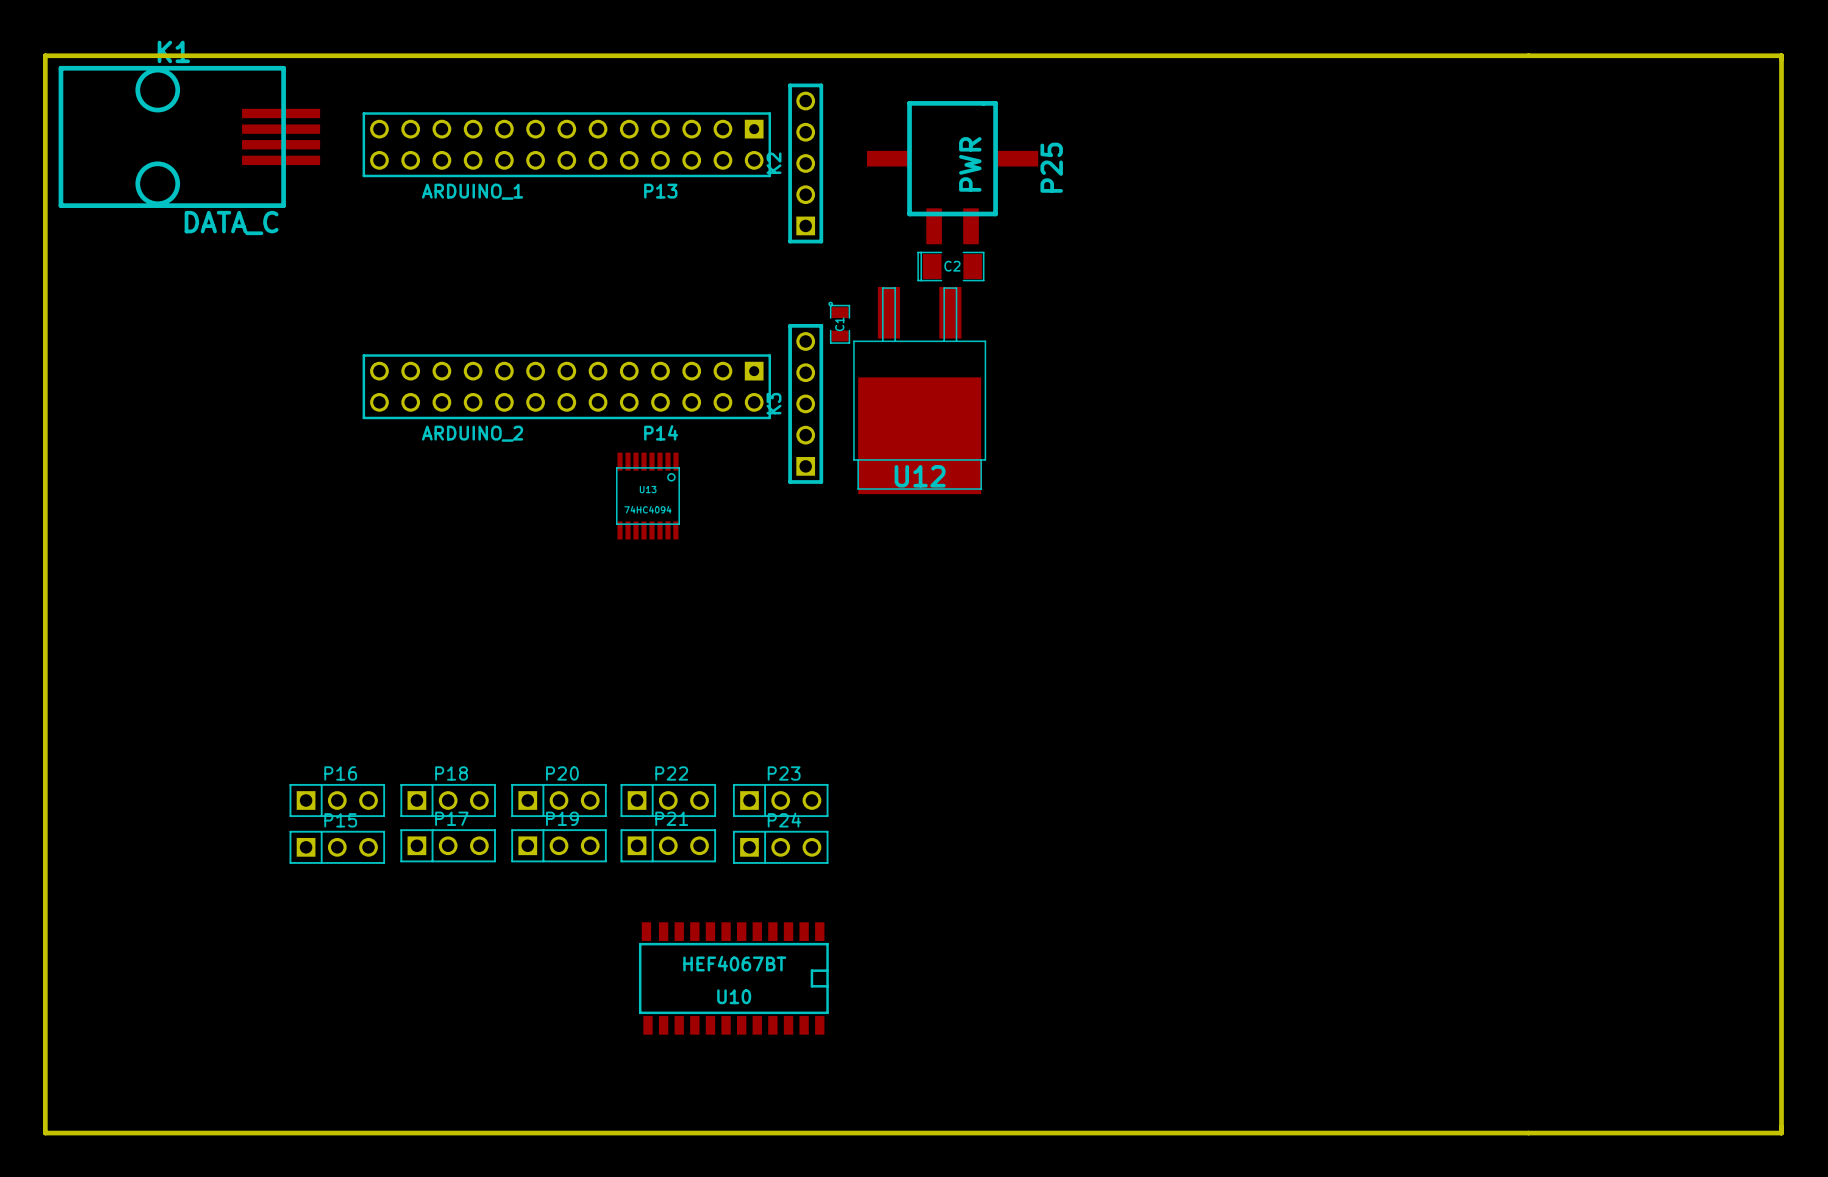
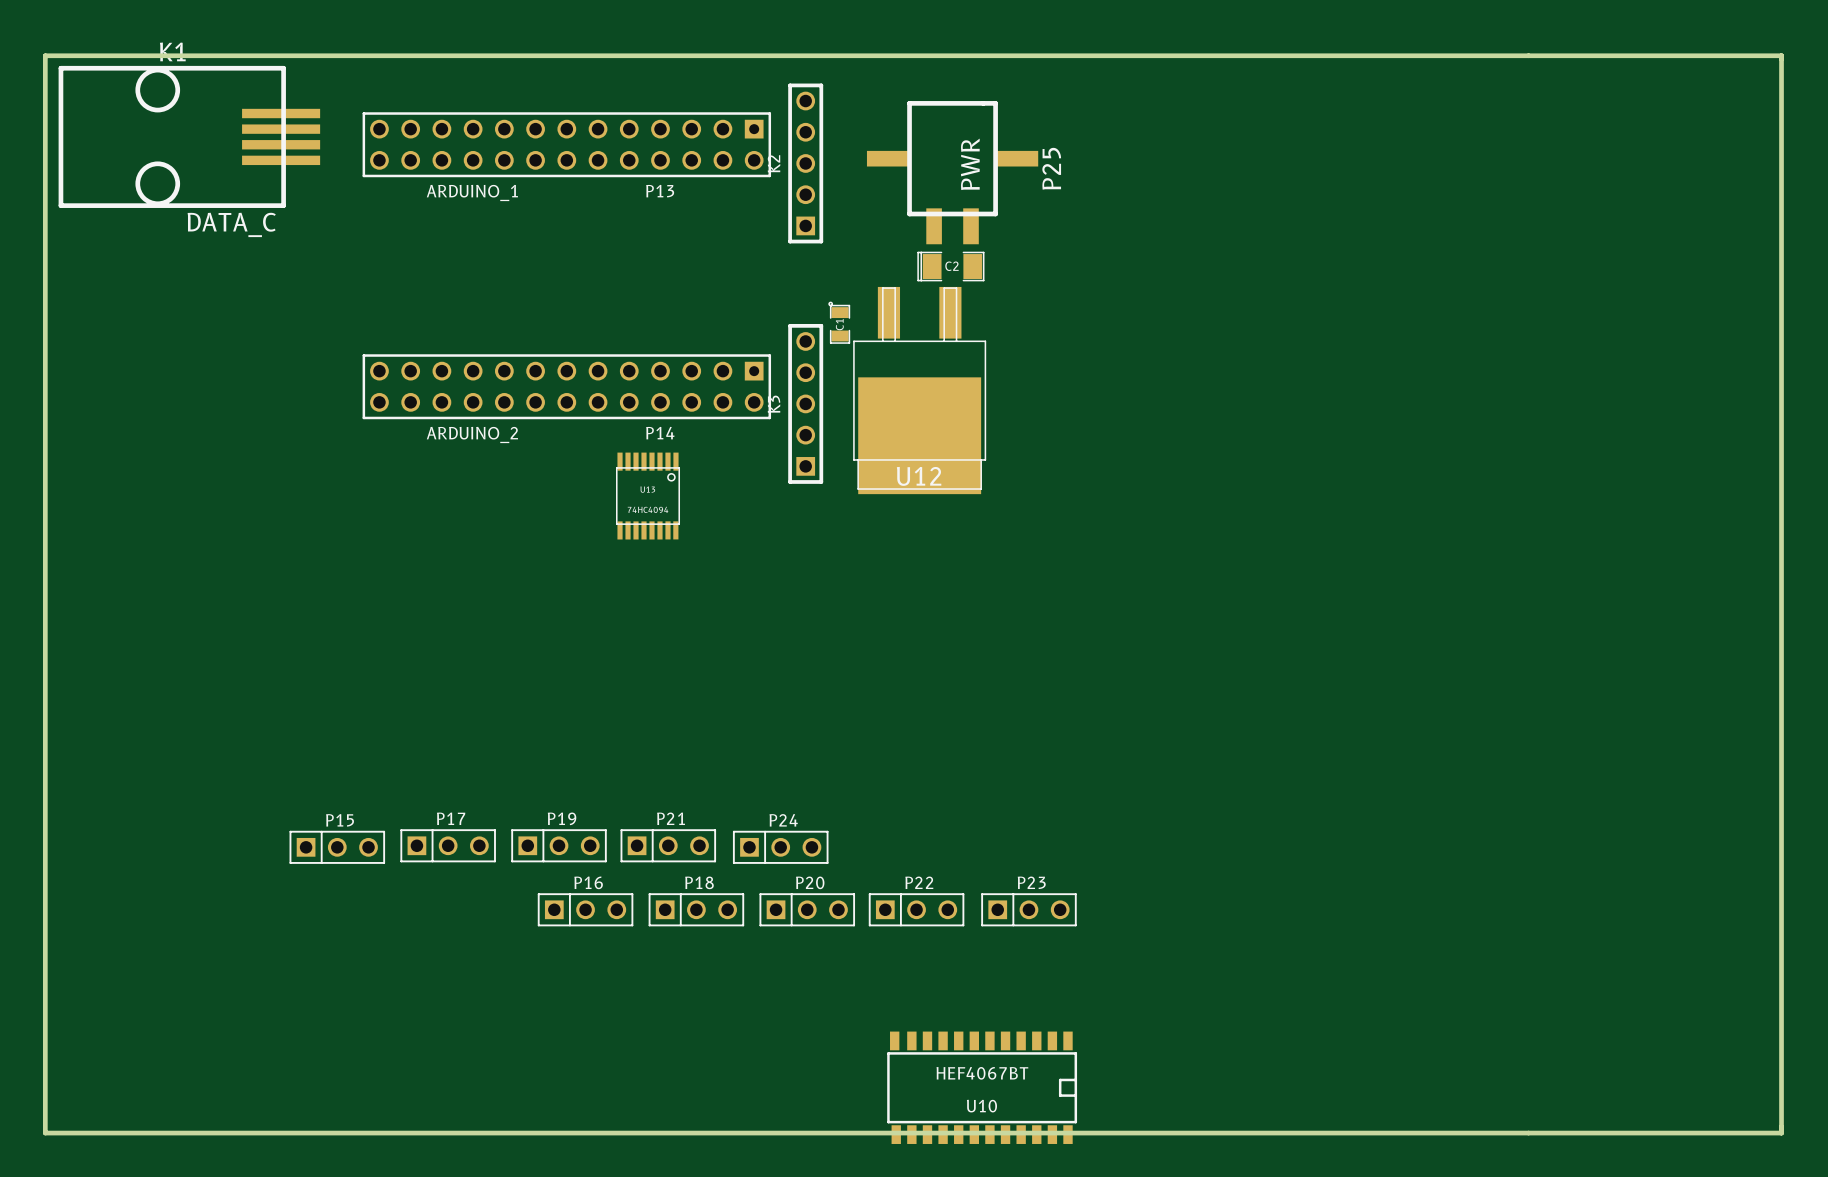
P16 position: (337, 800) -> (585, 909)
P18 position: (448, 800) -> (696, 909)
P20 position: (559, 800) -> (807, 909)
P22 position: (668, 800) -> (916, 909)
P23 position: (780, 800) -> (1028, 909)
U10 position: (733, 978) -> (982, 1087)

